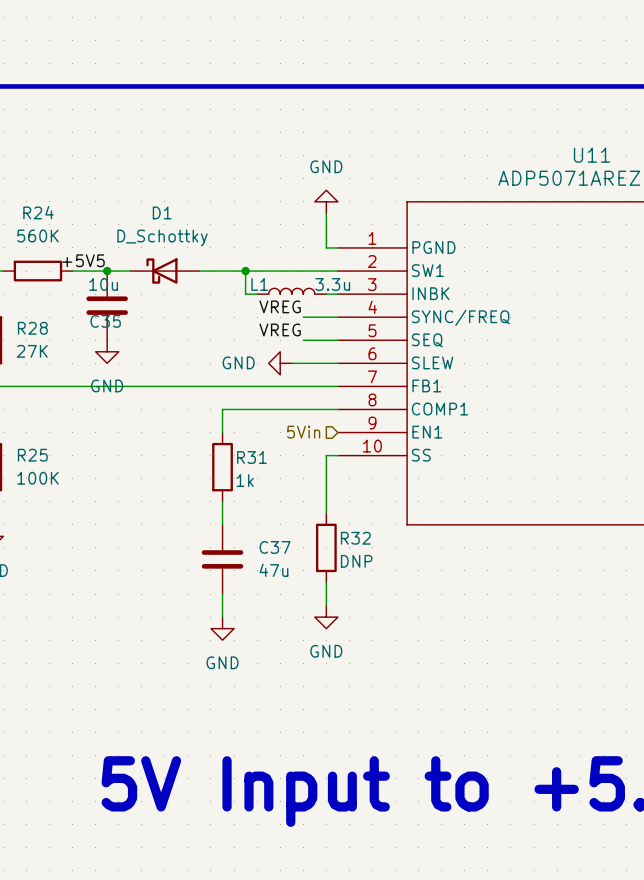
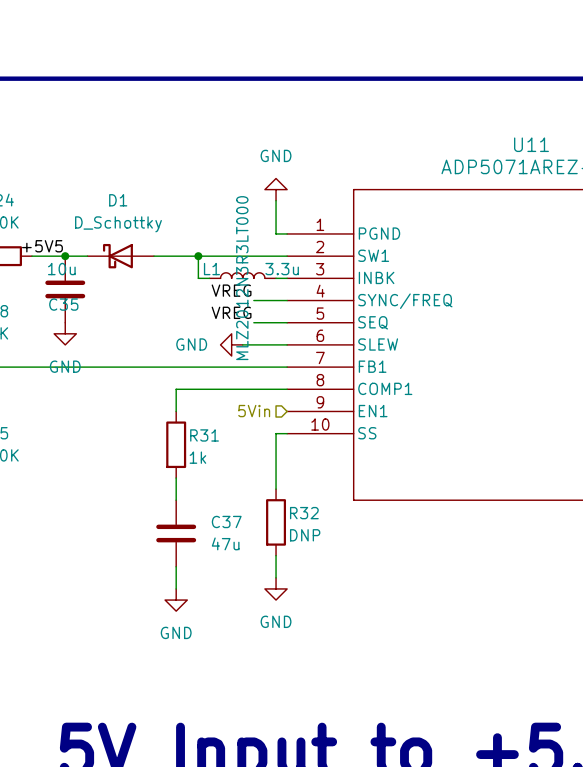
L1 text: none -> MLZ2012N3R3LT000 (242, 278)

